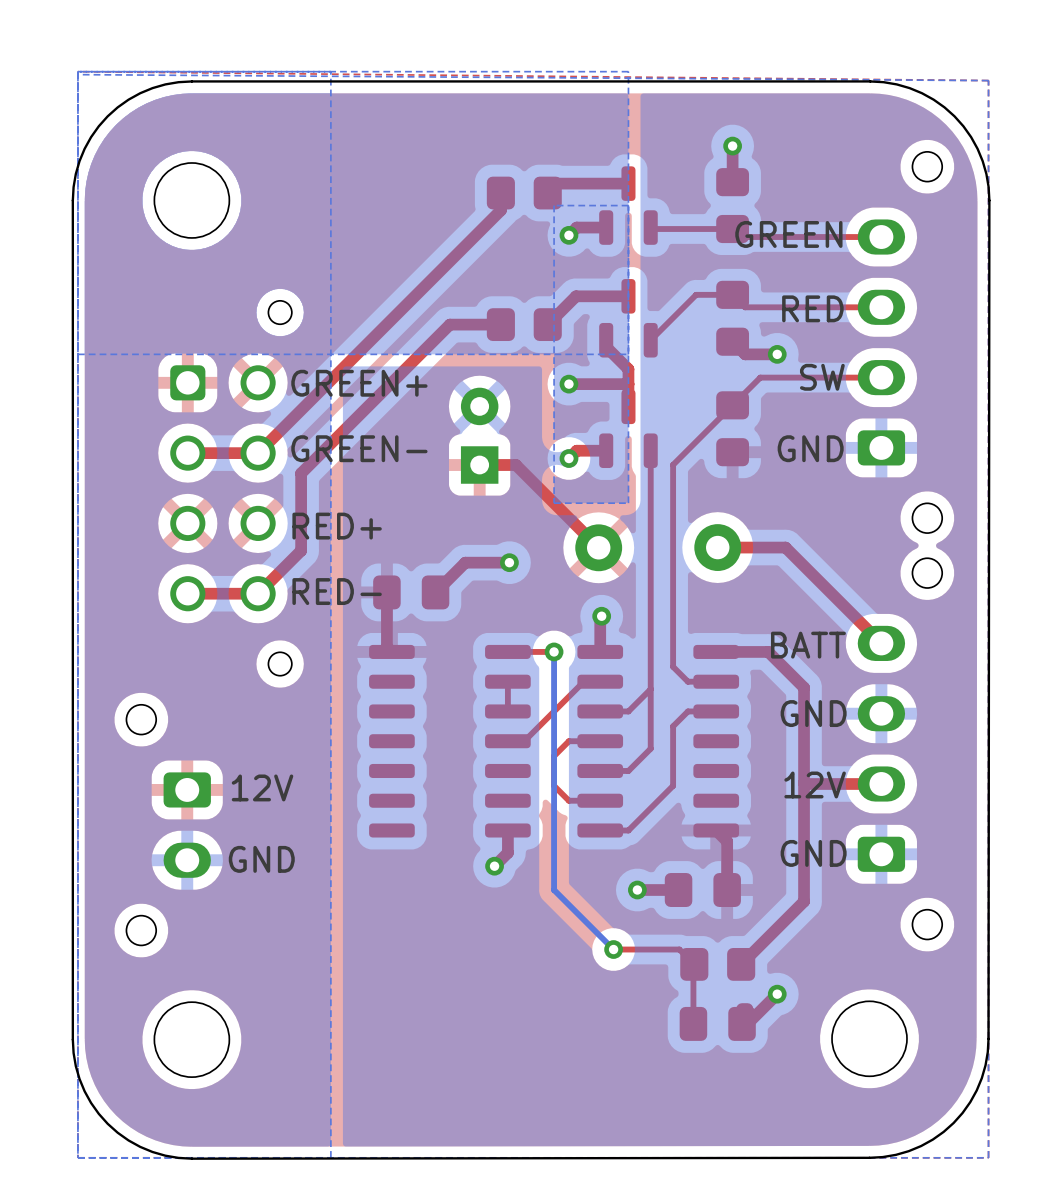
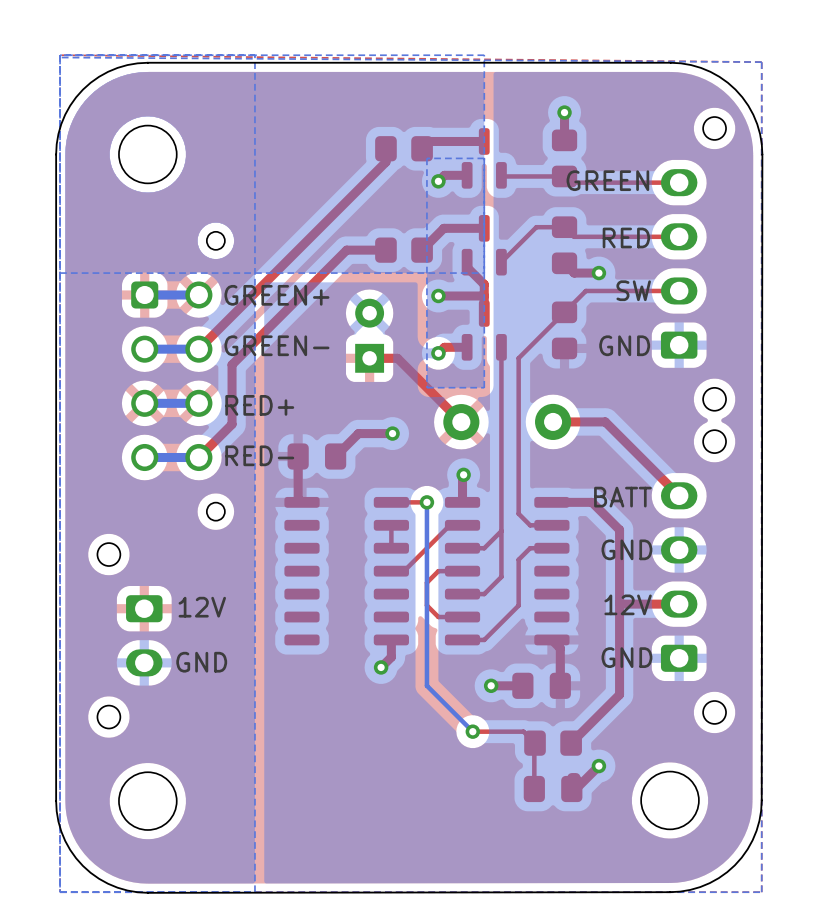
bottom track: none -> (198, 295) (144, 295)
top track: (258, 453) (187, 453) -> none
bottom track: none -> (198, 349) (144, 349)
bottom track: none -> (198, 403) (144, 403)
top track: (258, 593) (187, 593) -> none
bottom track: none -> (198, 457) (144, 457)

